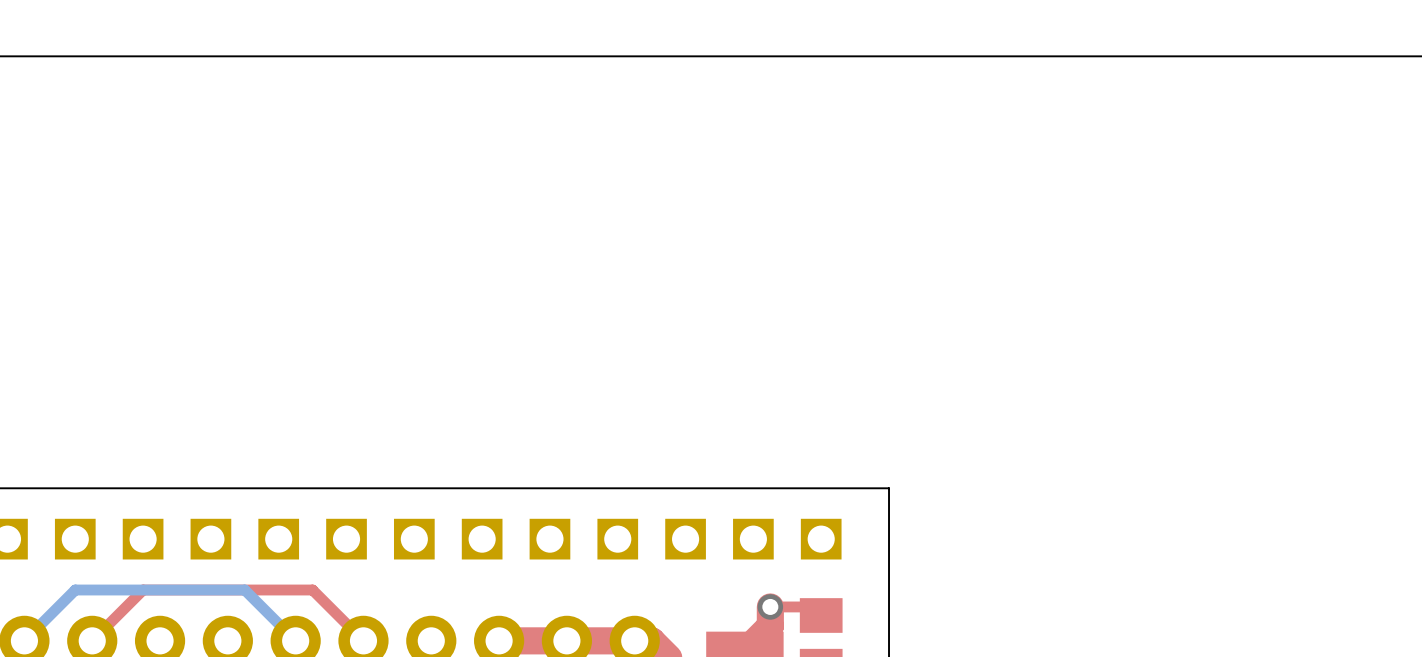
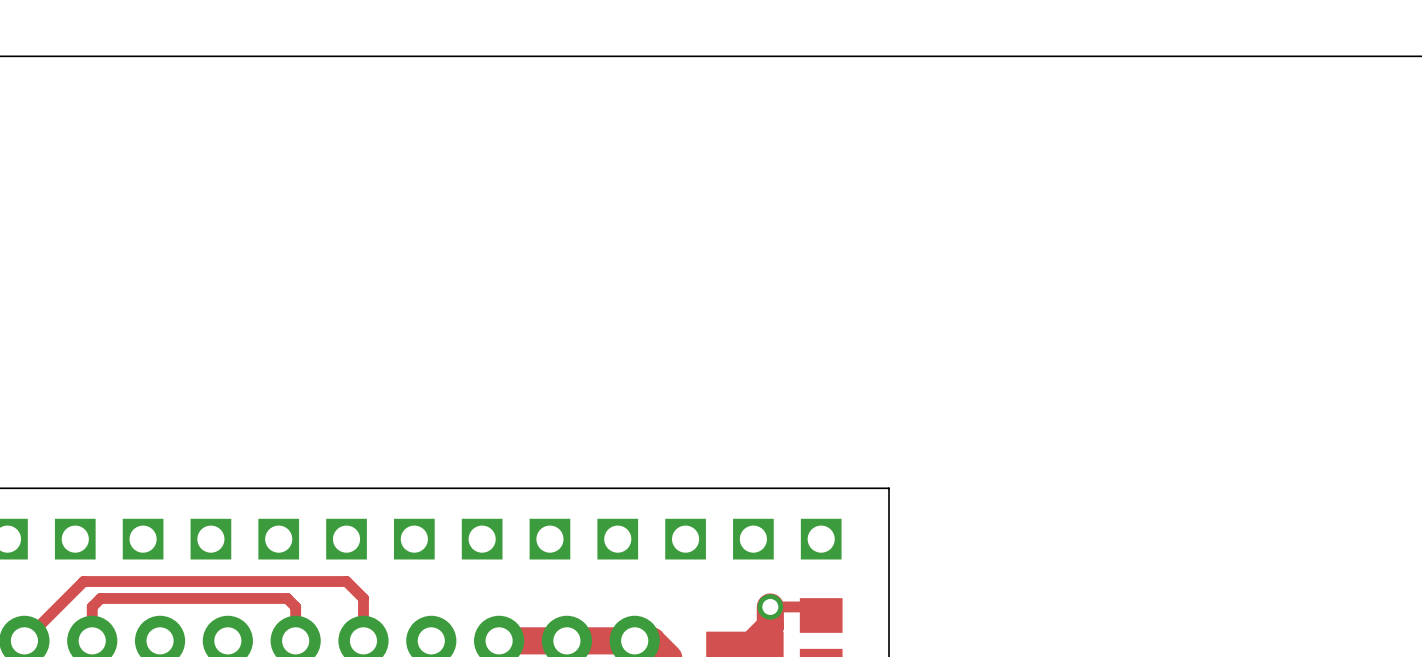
bottom track: (295, 640) (244, 590) (75, 590) (24, 640) -> none
top track: (363, 640) (312, 590) (143, 590) (92, 640) -> (295, 640) (295, 606) (287, 598) (100, 598) (92, 606) (92, 640)
top track: none -> (363, 640) (363, 598) (346, 581) (83, 581) (24, 640)

